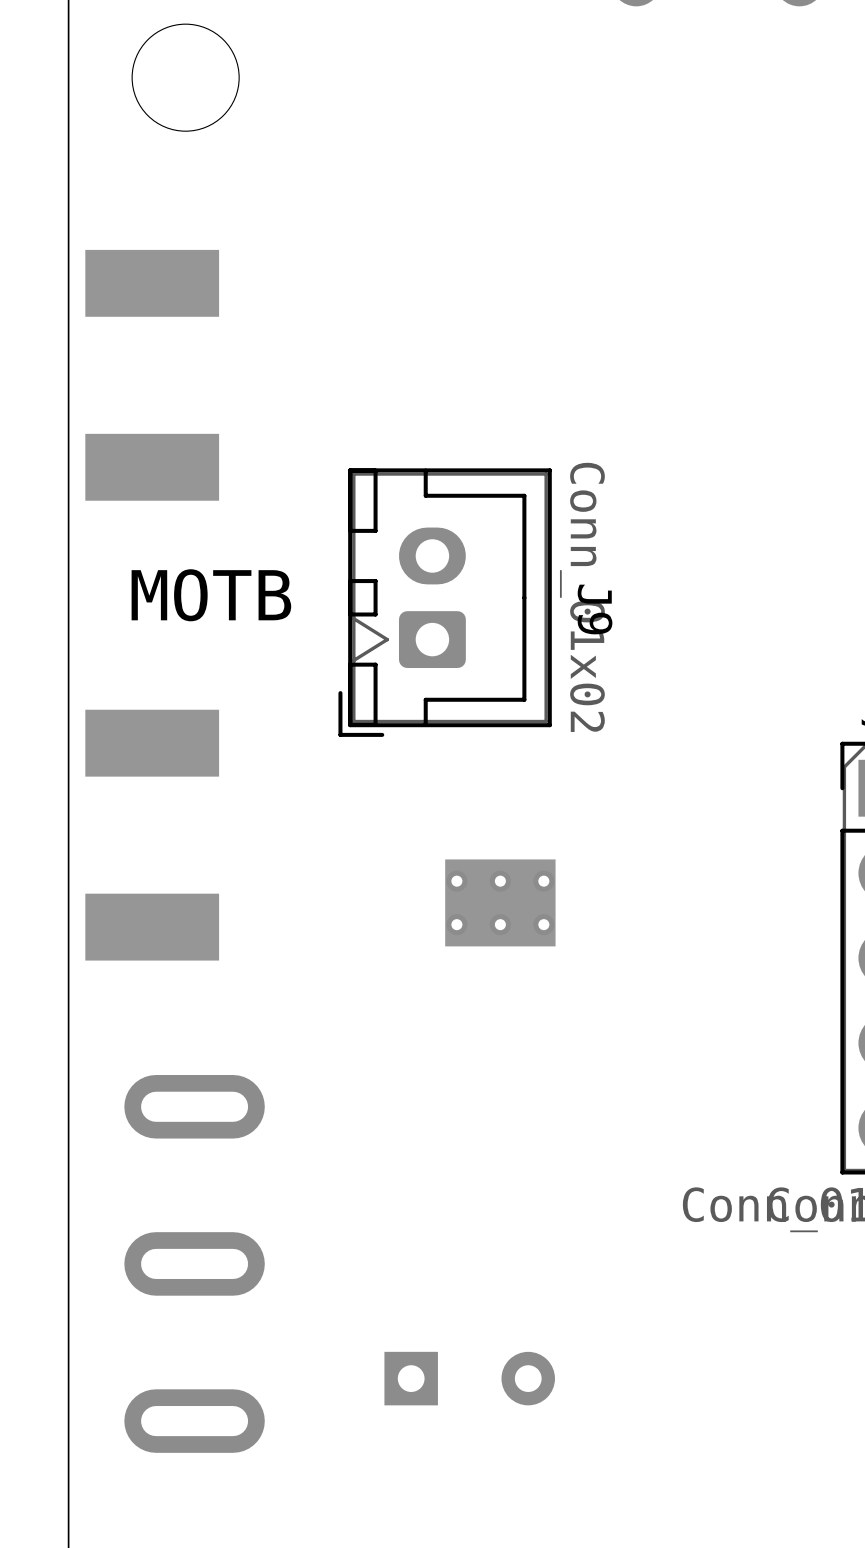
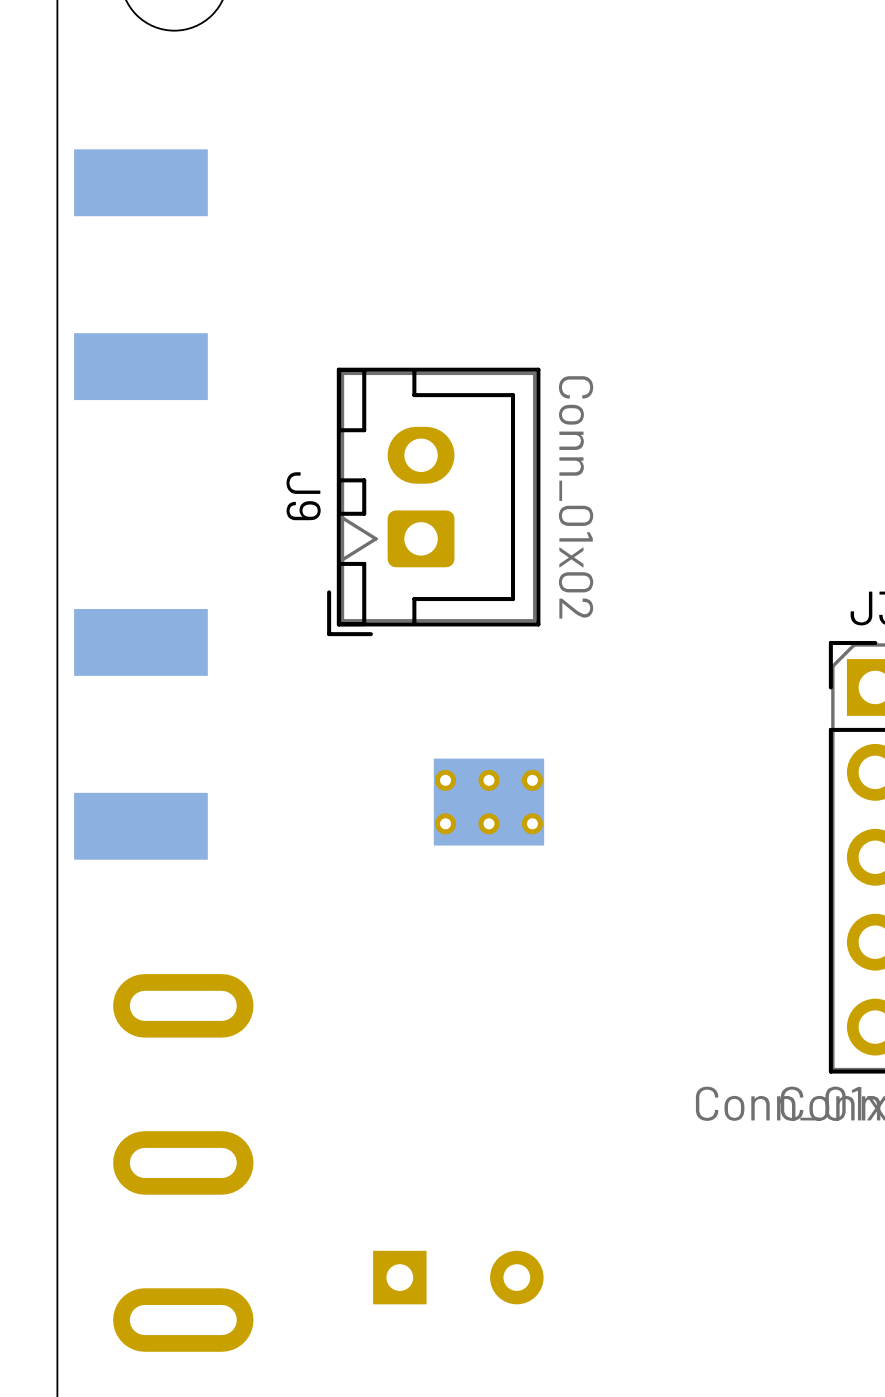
text: MOTB (211, 595) -> none
J9 name position: J9 (595, 609) -> J9 (303, 496)

